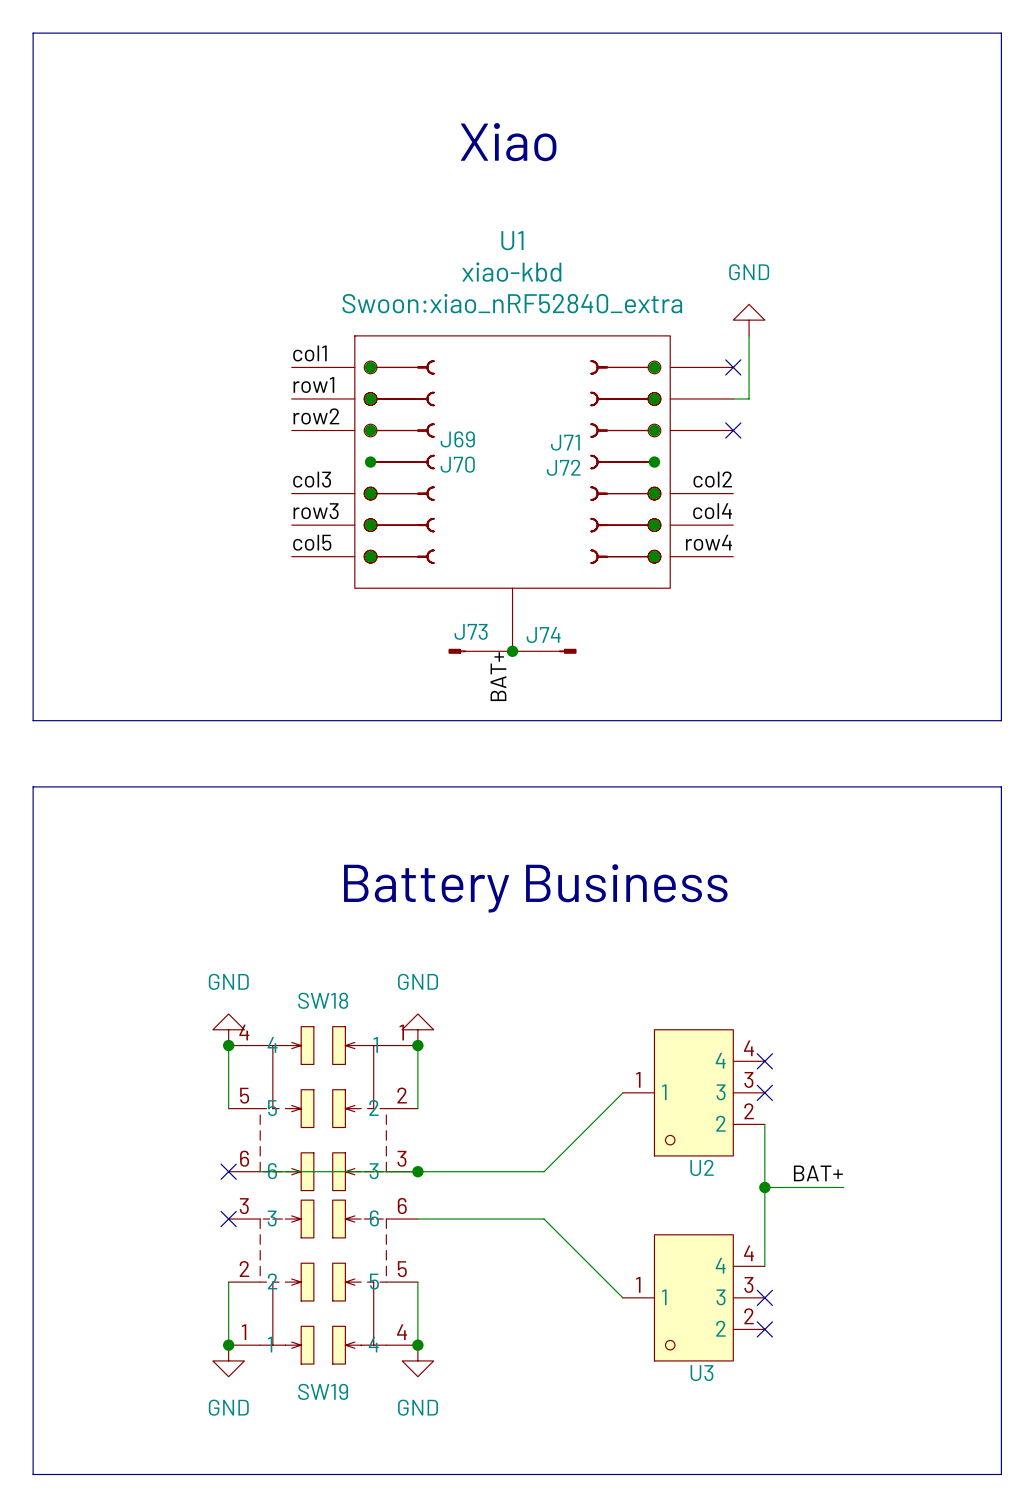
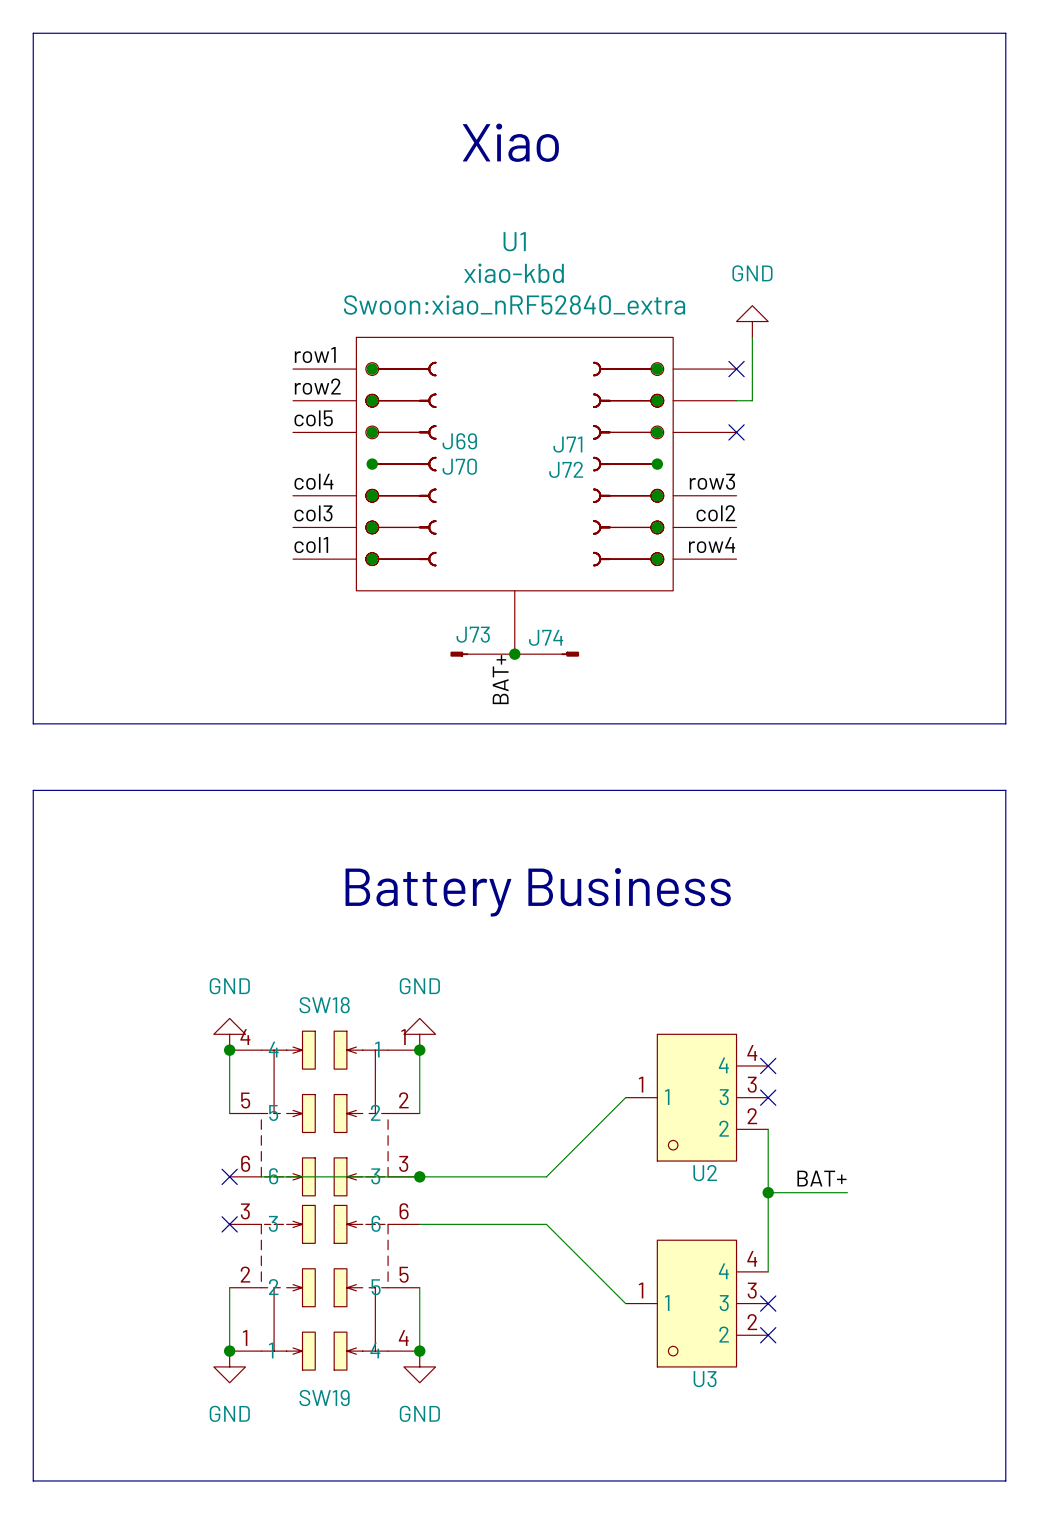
label: col1 (309, 353) -> row1 (315, 355)
label: row1 (313, 384) -> row2 (317, 386)
label: row2 (316, 416) -> col5 (313, 418)
label: col3 (312, 479) -> col4 (313, 481)
label: col2 (712, 479) -> row3 (712, 481)
label: row3 (316, 511) -> col3 (313, 513)
label: col4 (712, 511) -> col2 (715, 513)
label: col5 (312, 542) -> col1 (311, 545)

